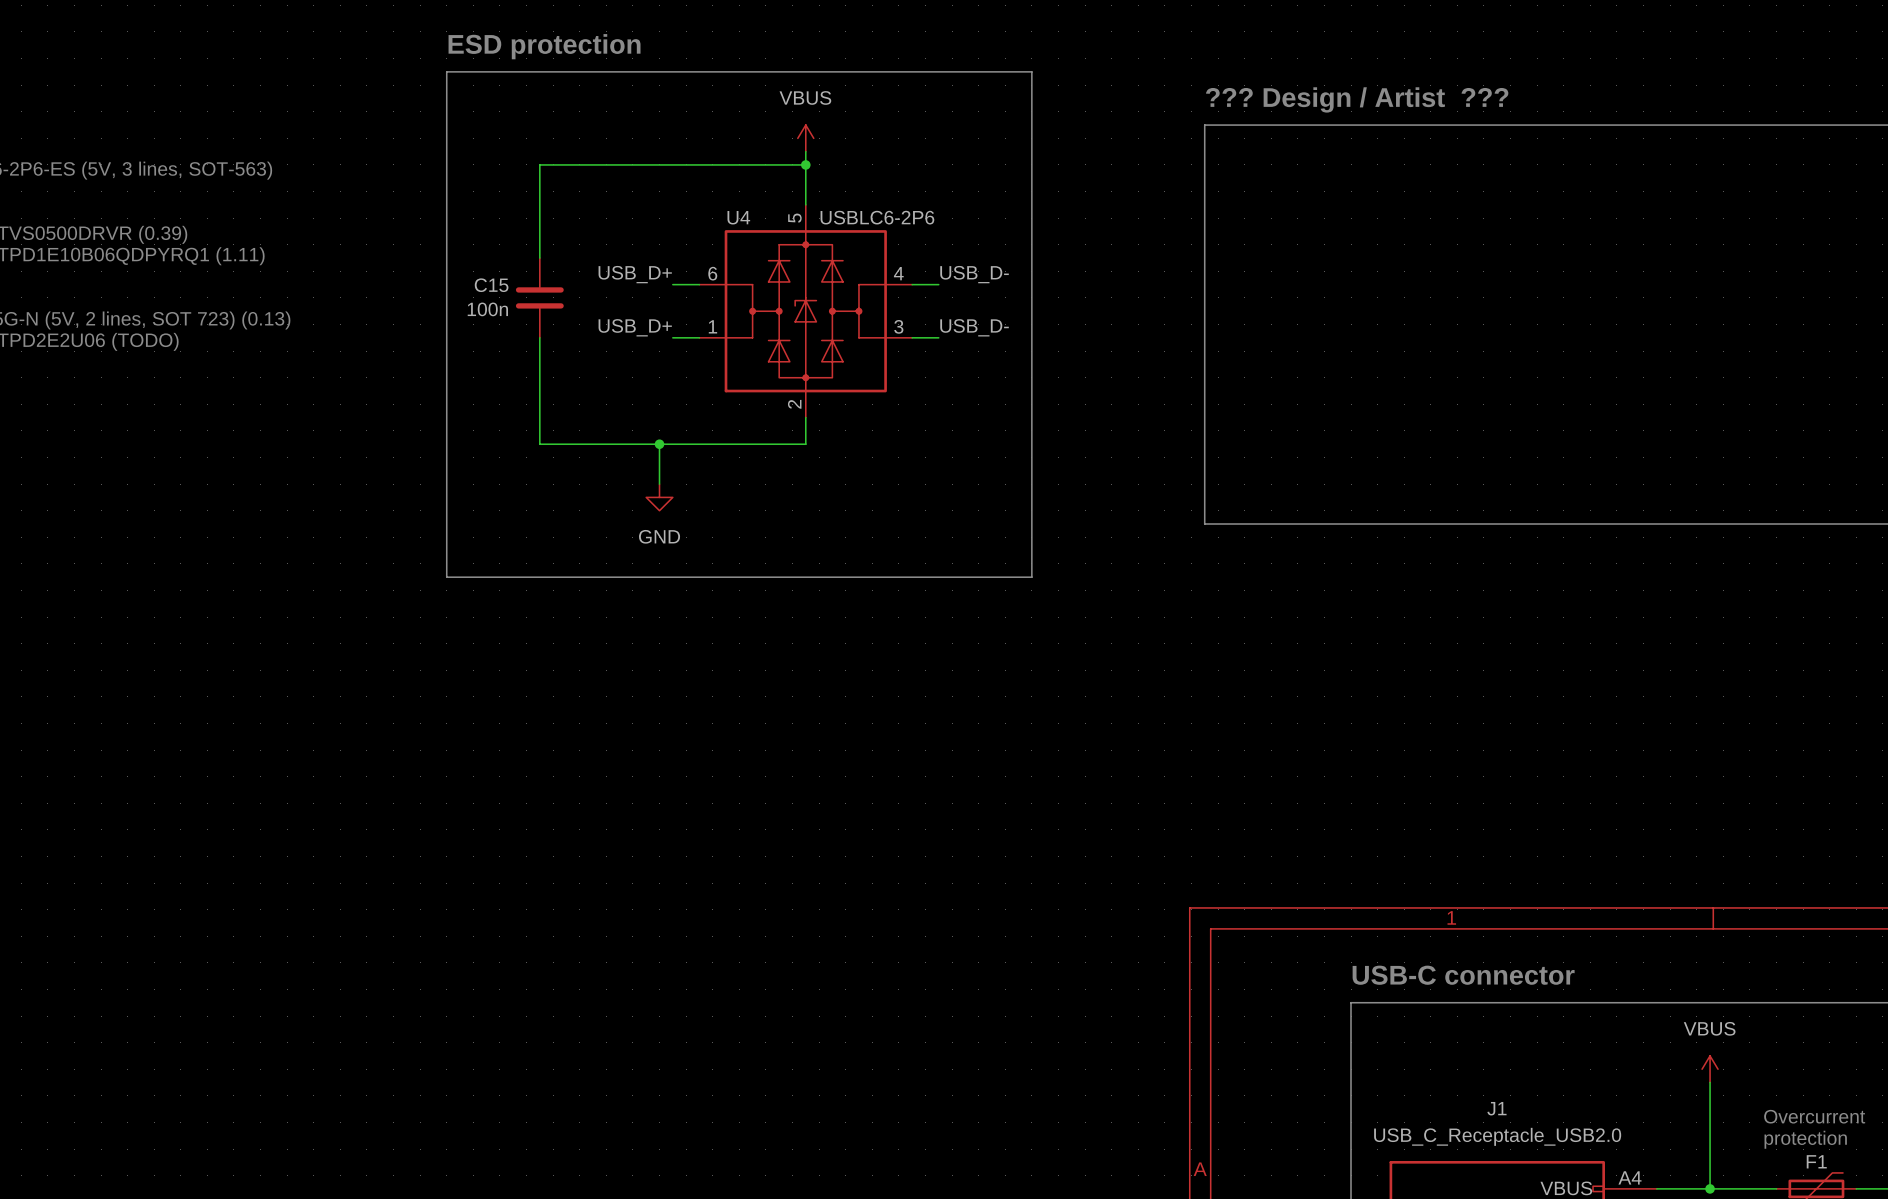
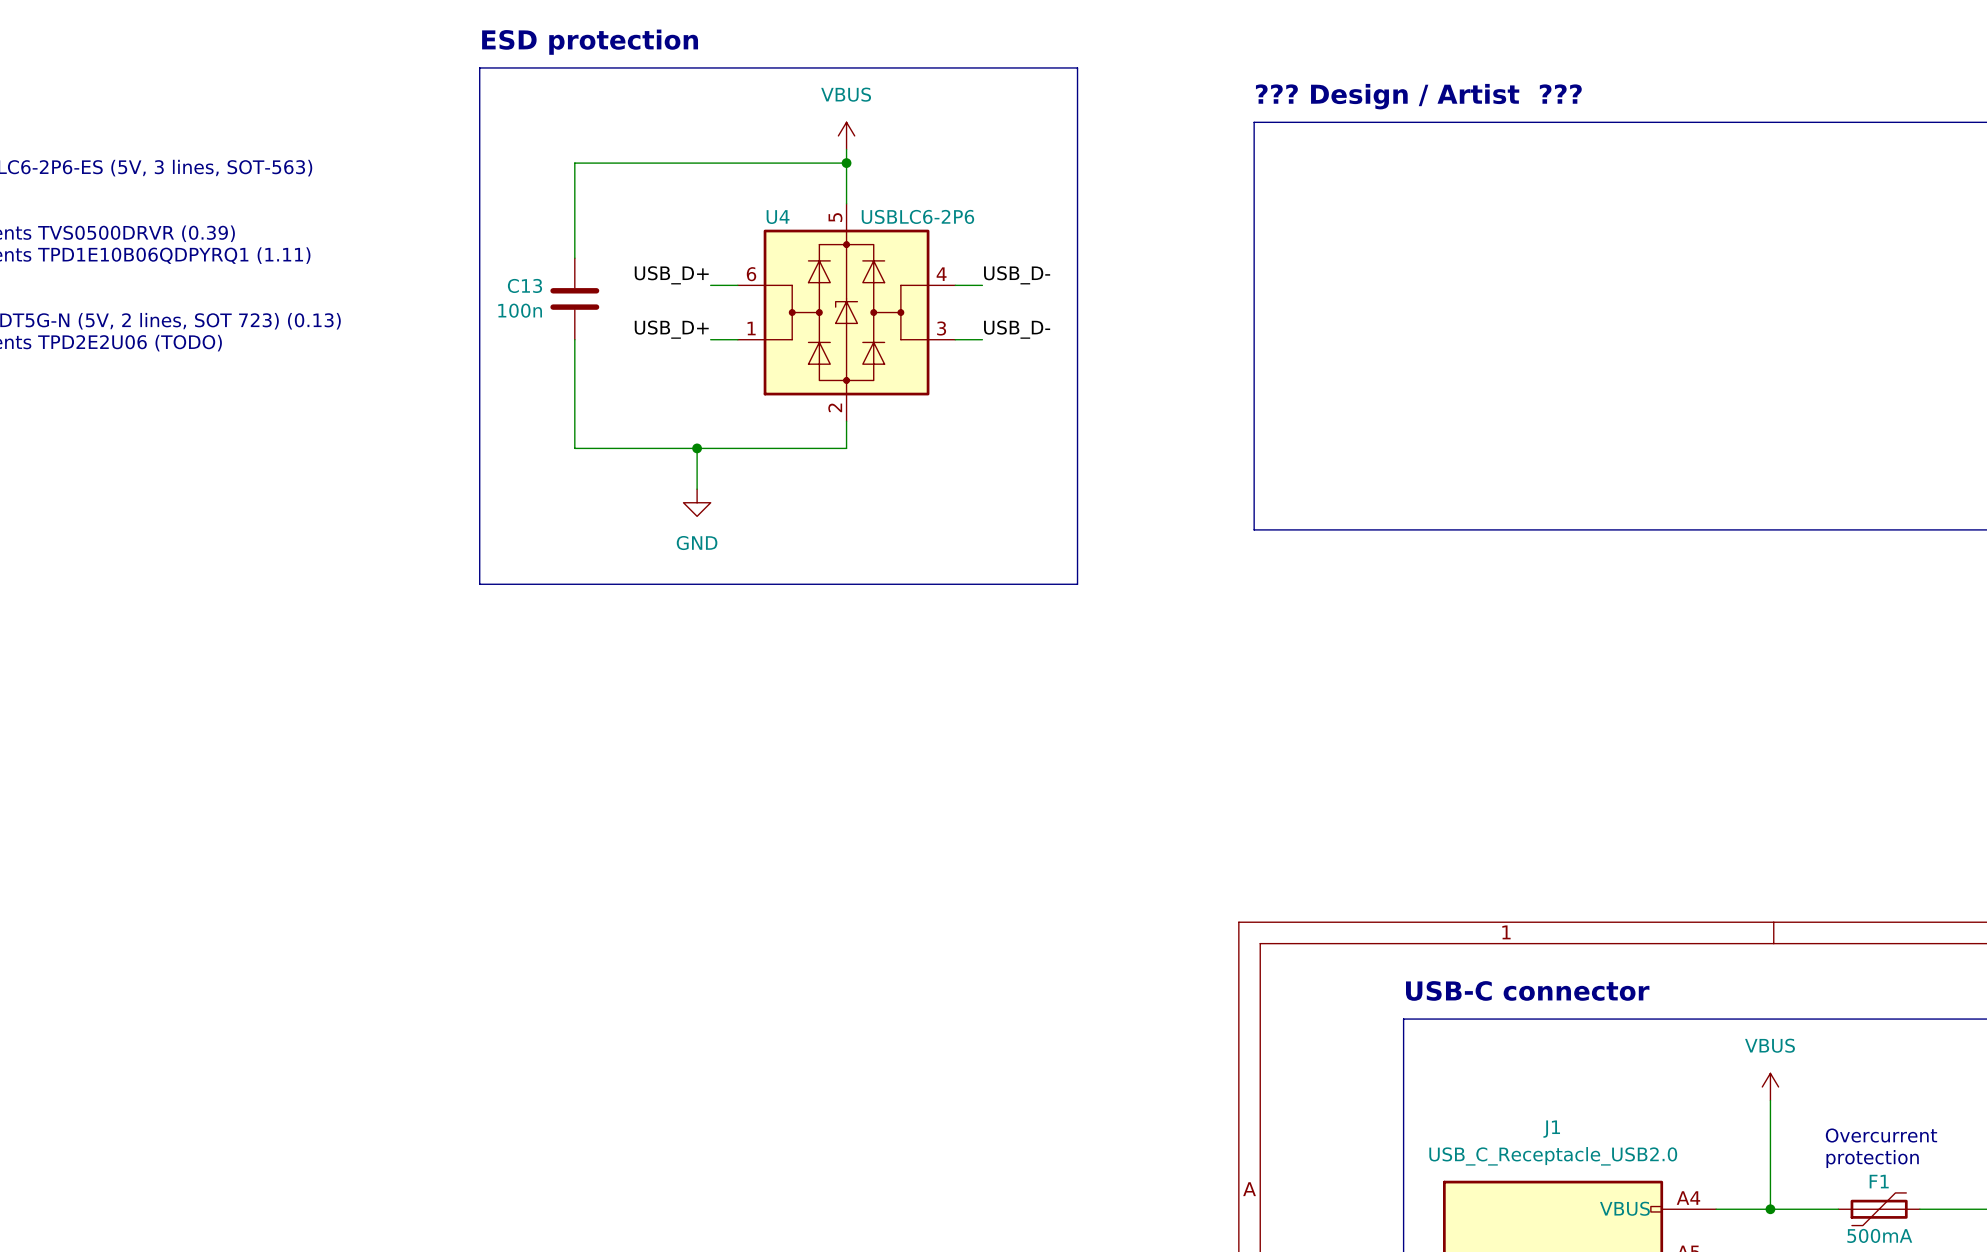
C15 name: C15 (491, 285) -> C13 (524, 285)

